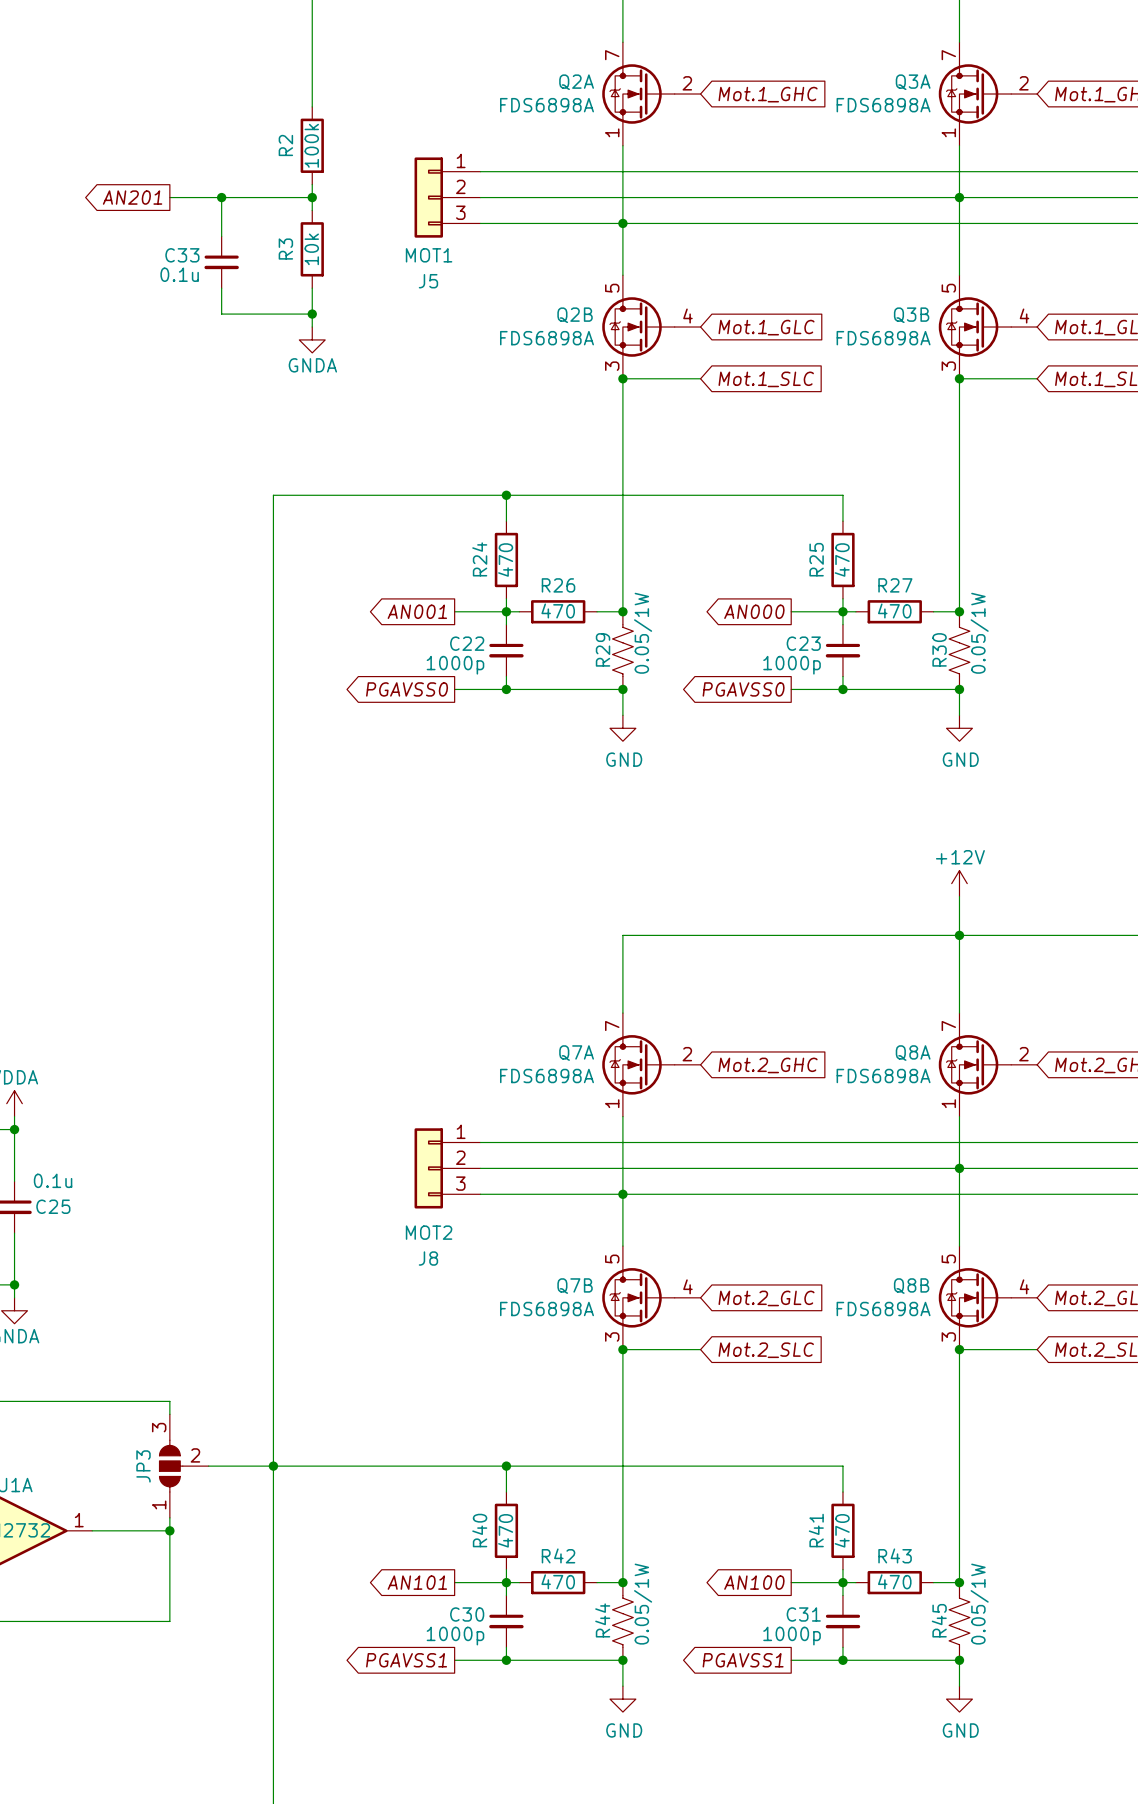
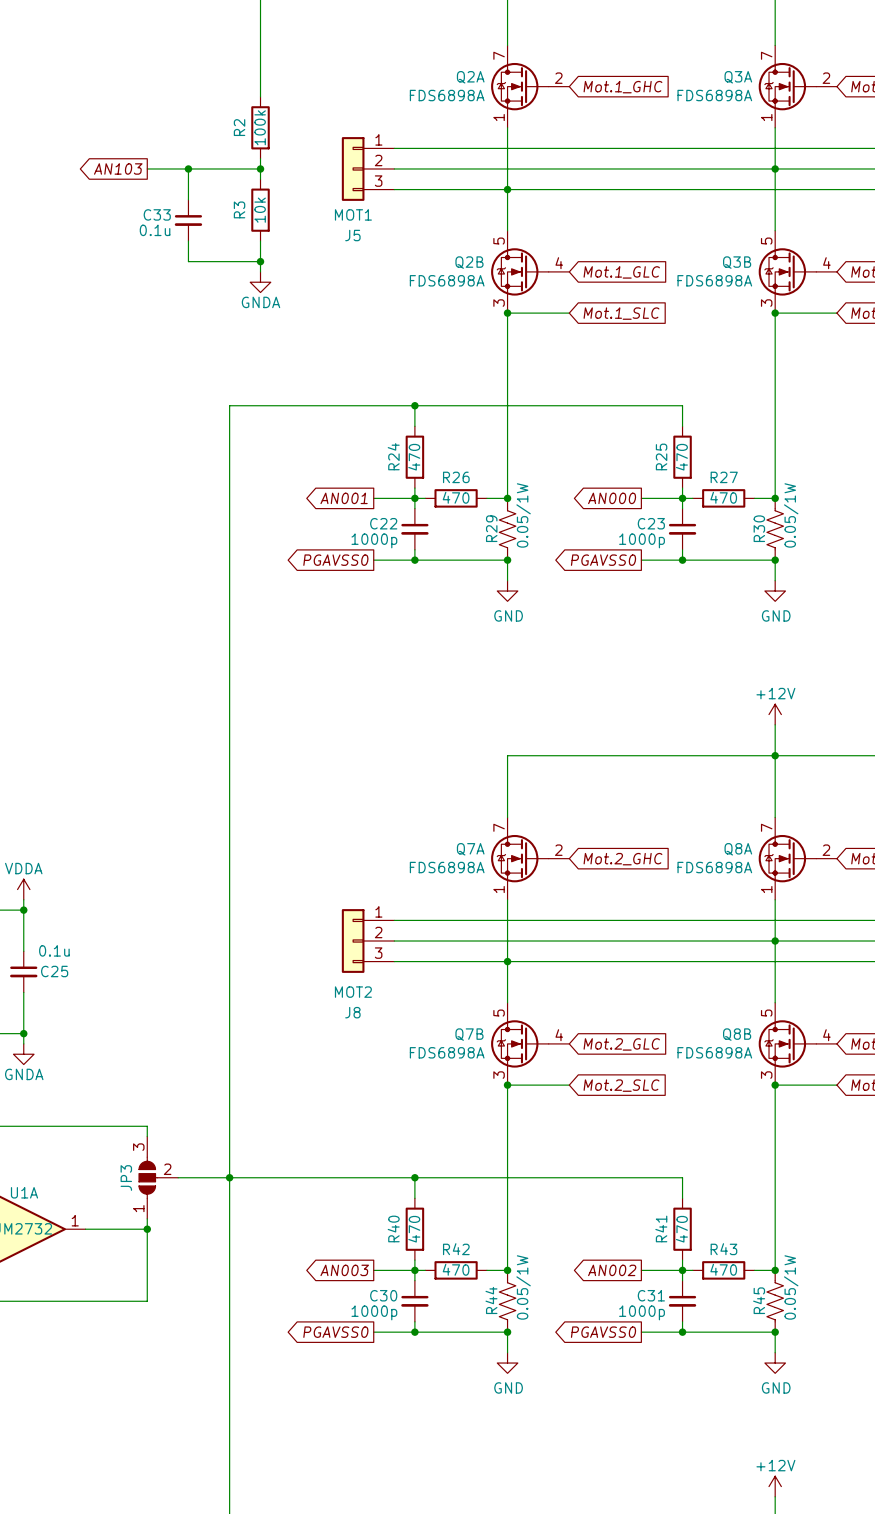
global label: AN201 (132, 197) -> AN103 (118, 168)
global label: AN101 (417, 1582) -> AN003 (344, 1270)
global label: AN100 (754, 1582) -> AN002 (612, 1270)
global label: PGAVSS1 (406, 1660) -> PGAVSS0 (335, 1332)
global label: PGAVSS1 (743, 1660) -> PGAVSS0 (603, 1332)

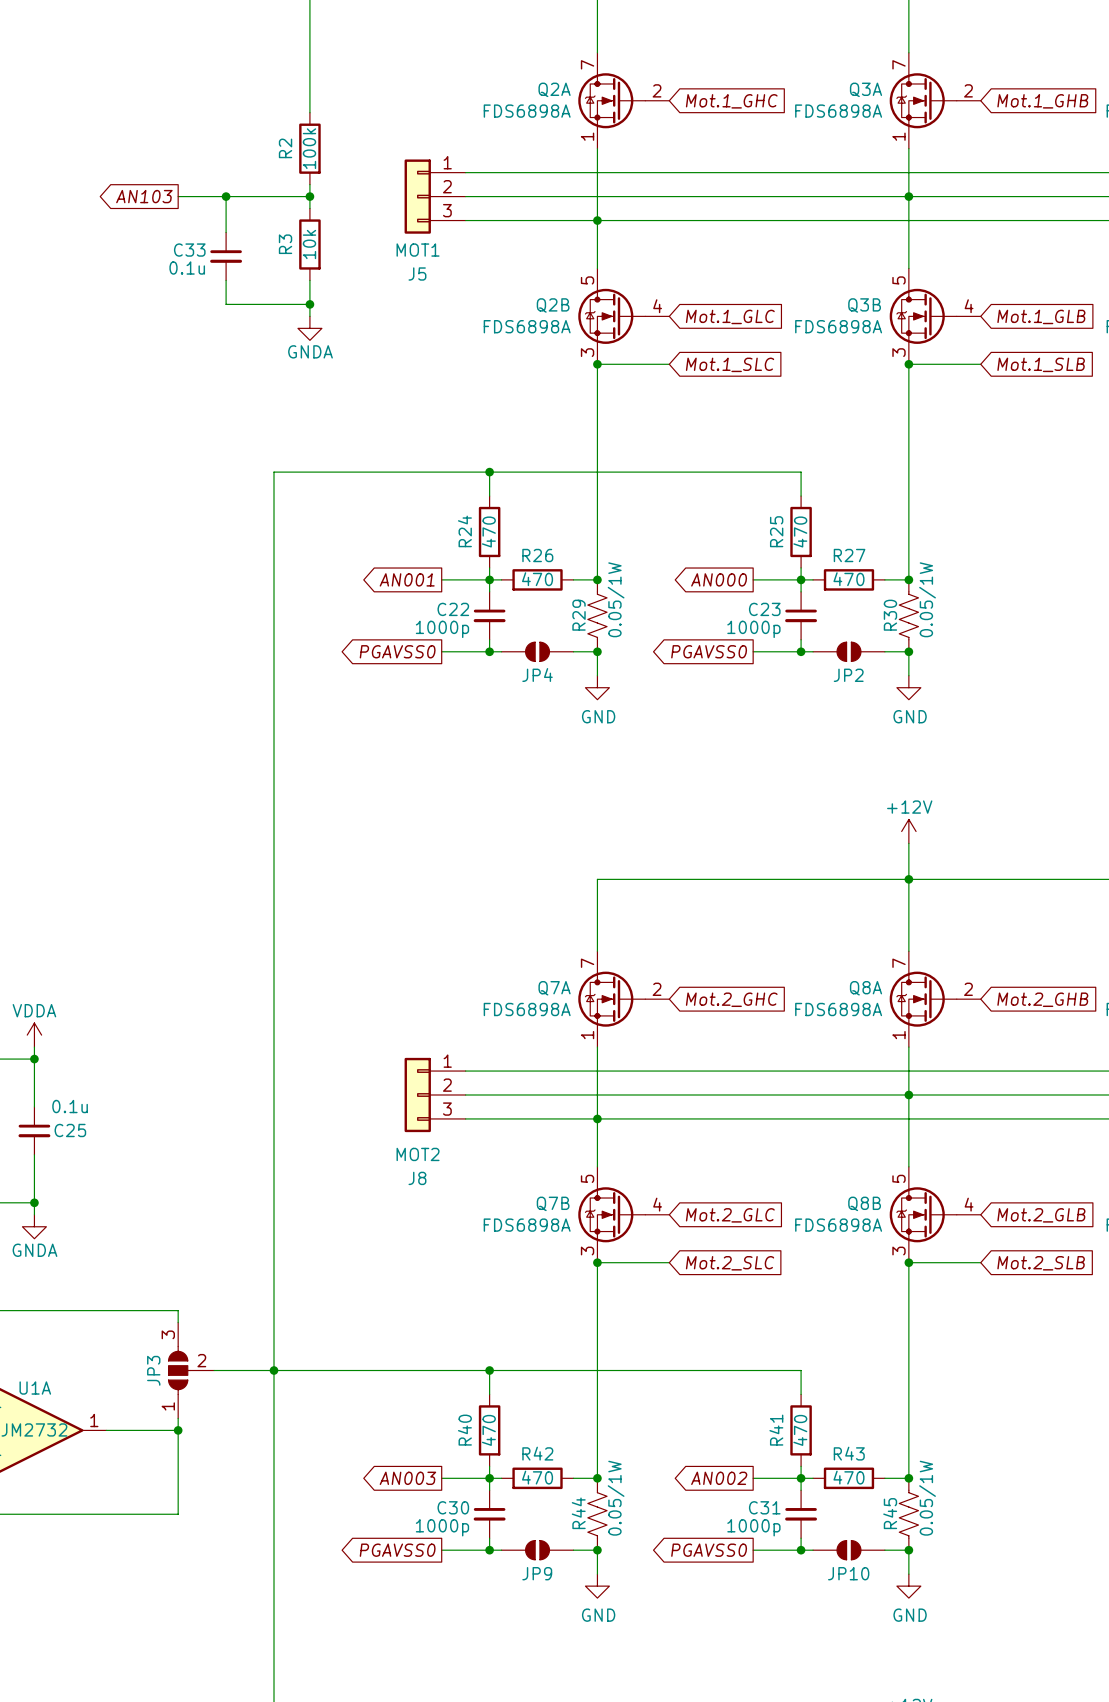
JP4: none -> (537, 651)
JP2: none -> (848, 651)
JP9: none -> (537, 1550)
JP10: none -> (848, 1550)

